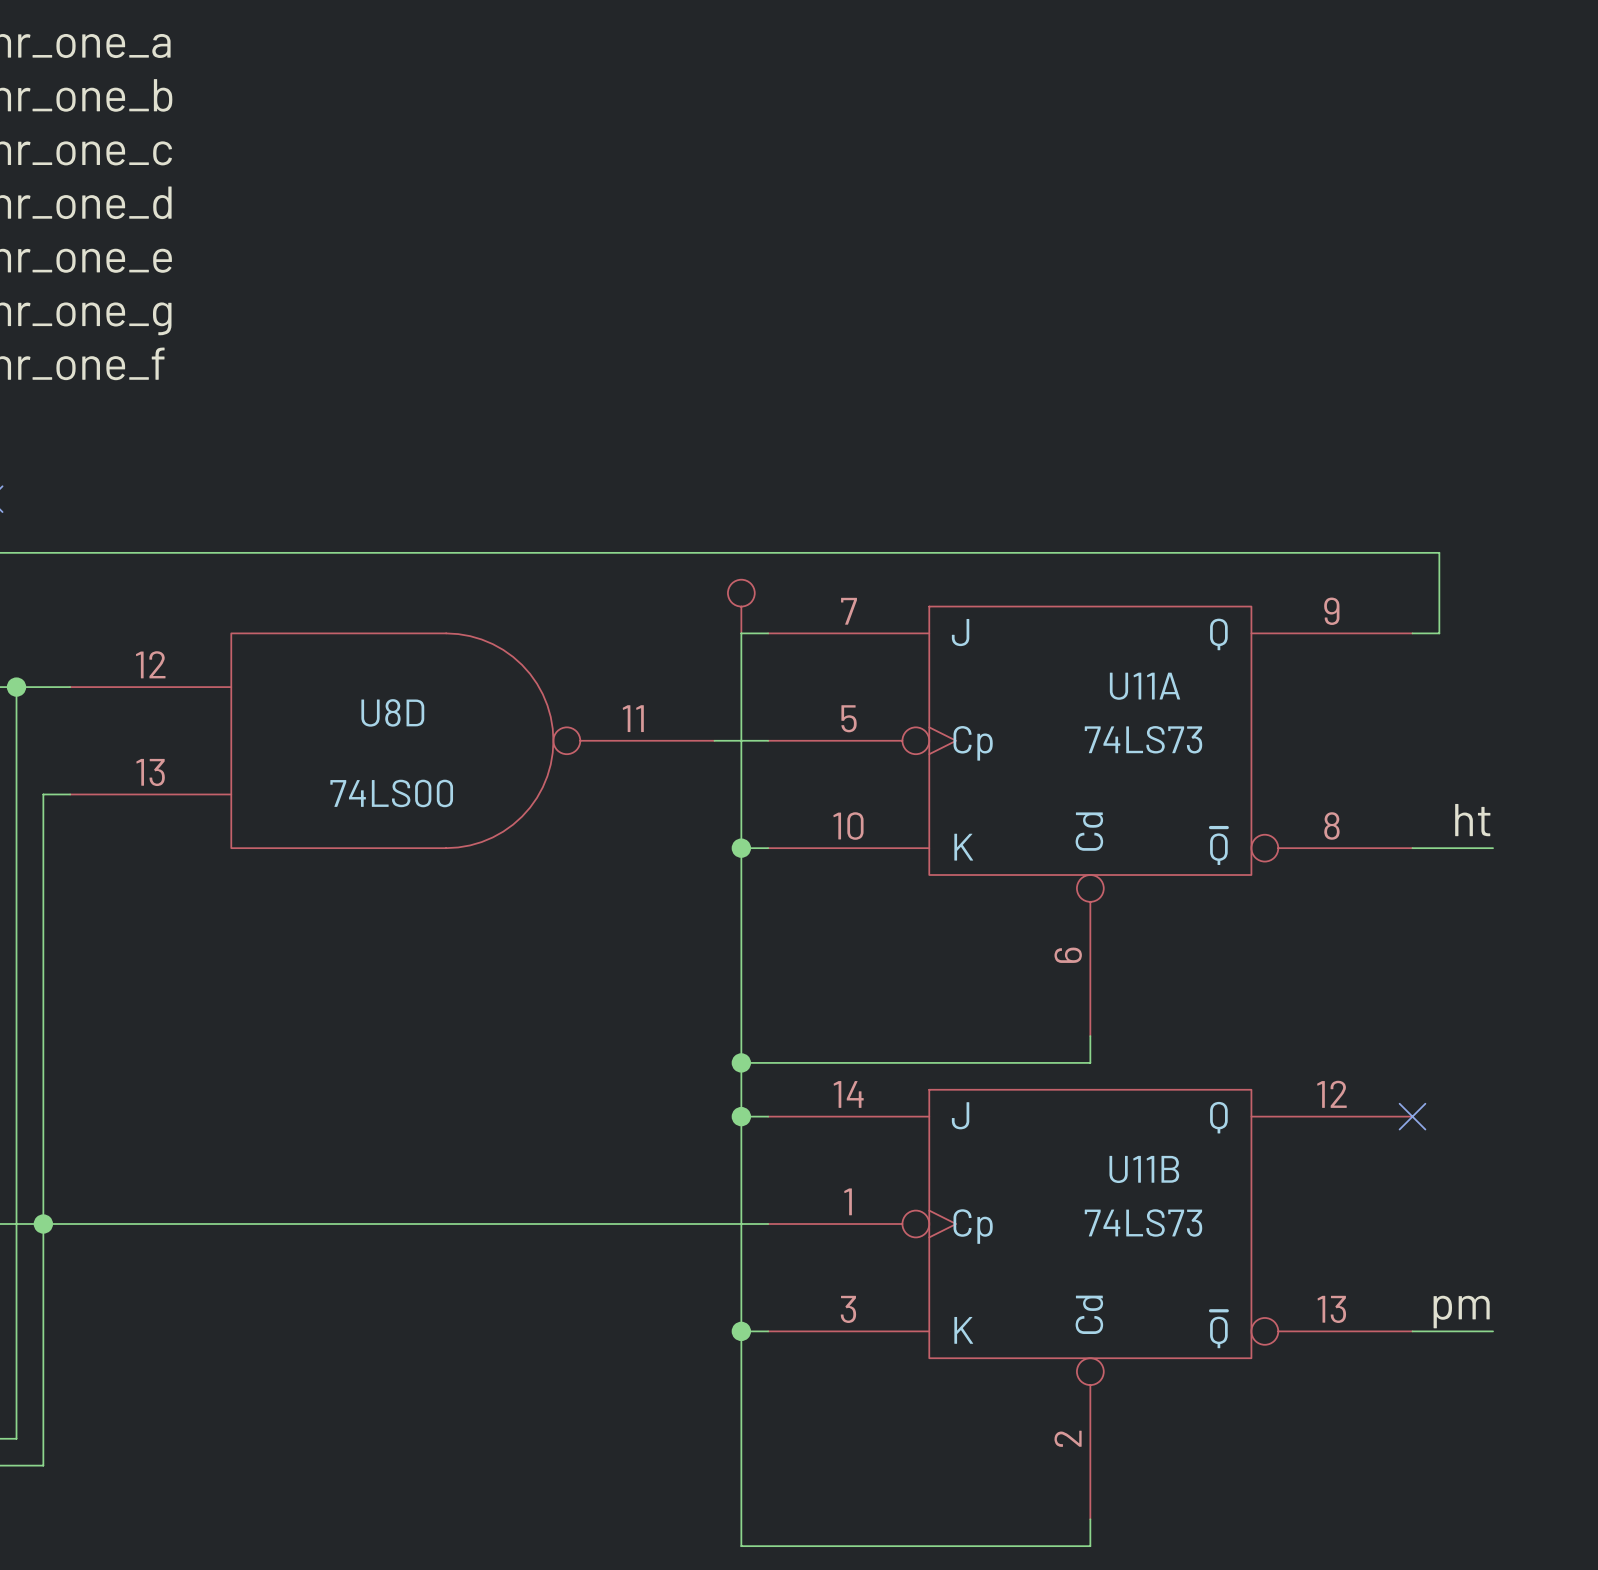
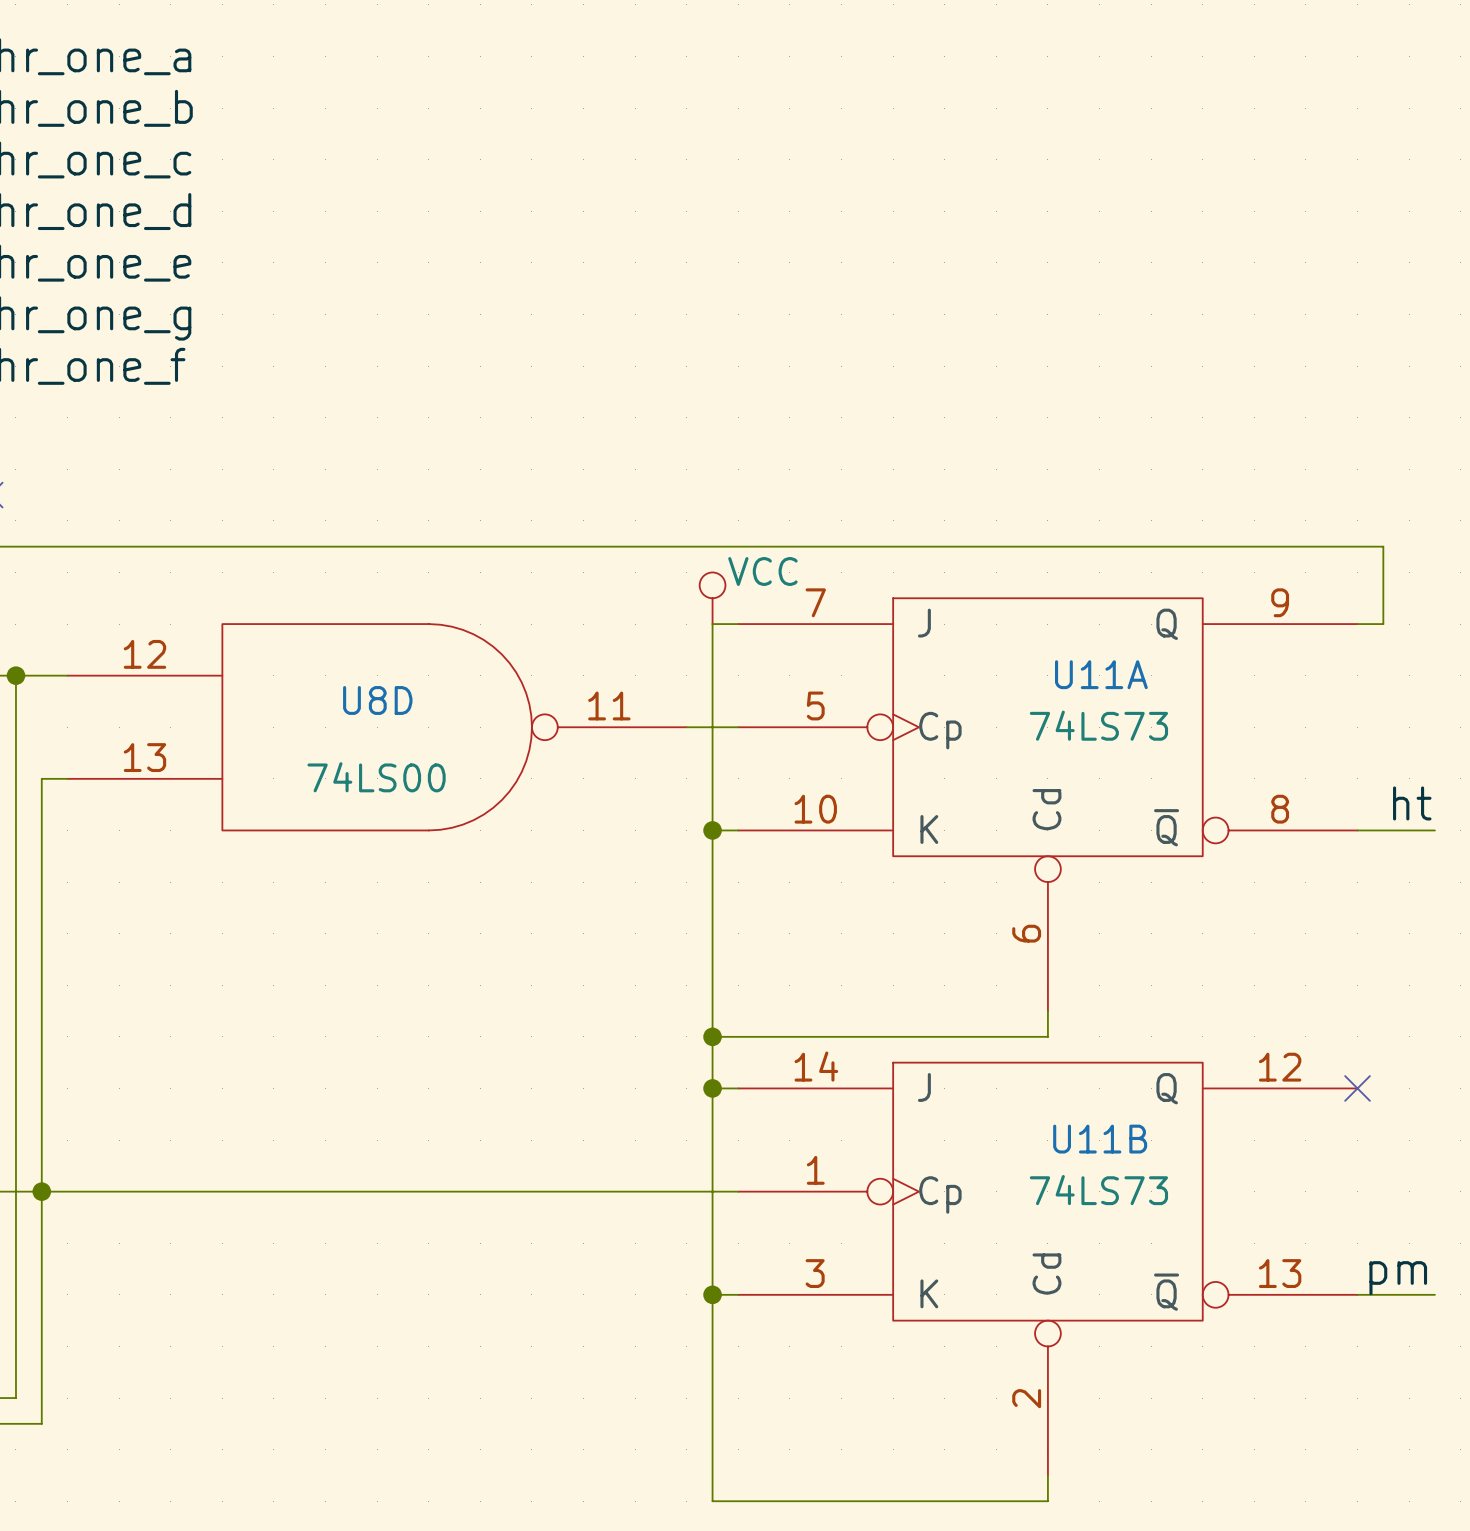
power symbol text: none -> VCC (762, 571)

